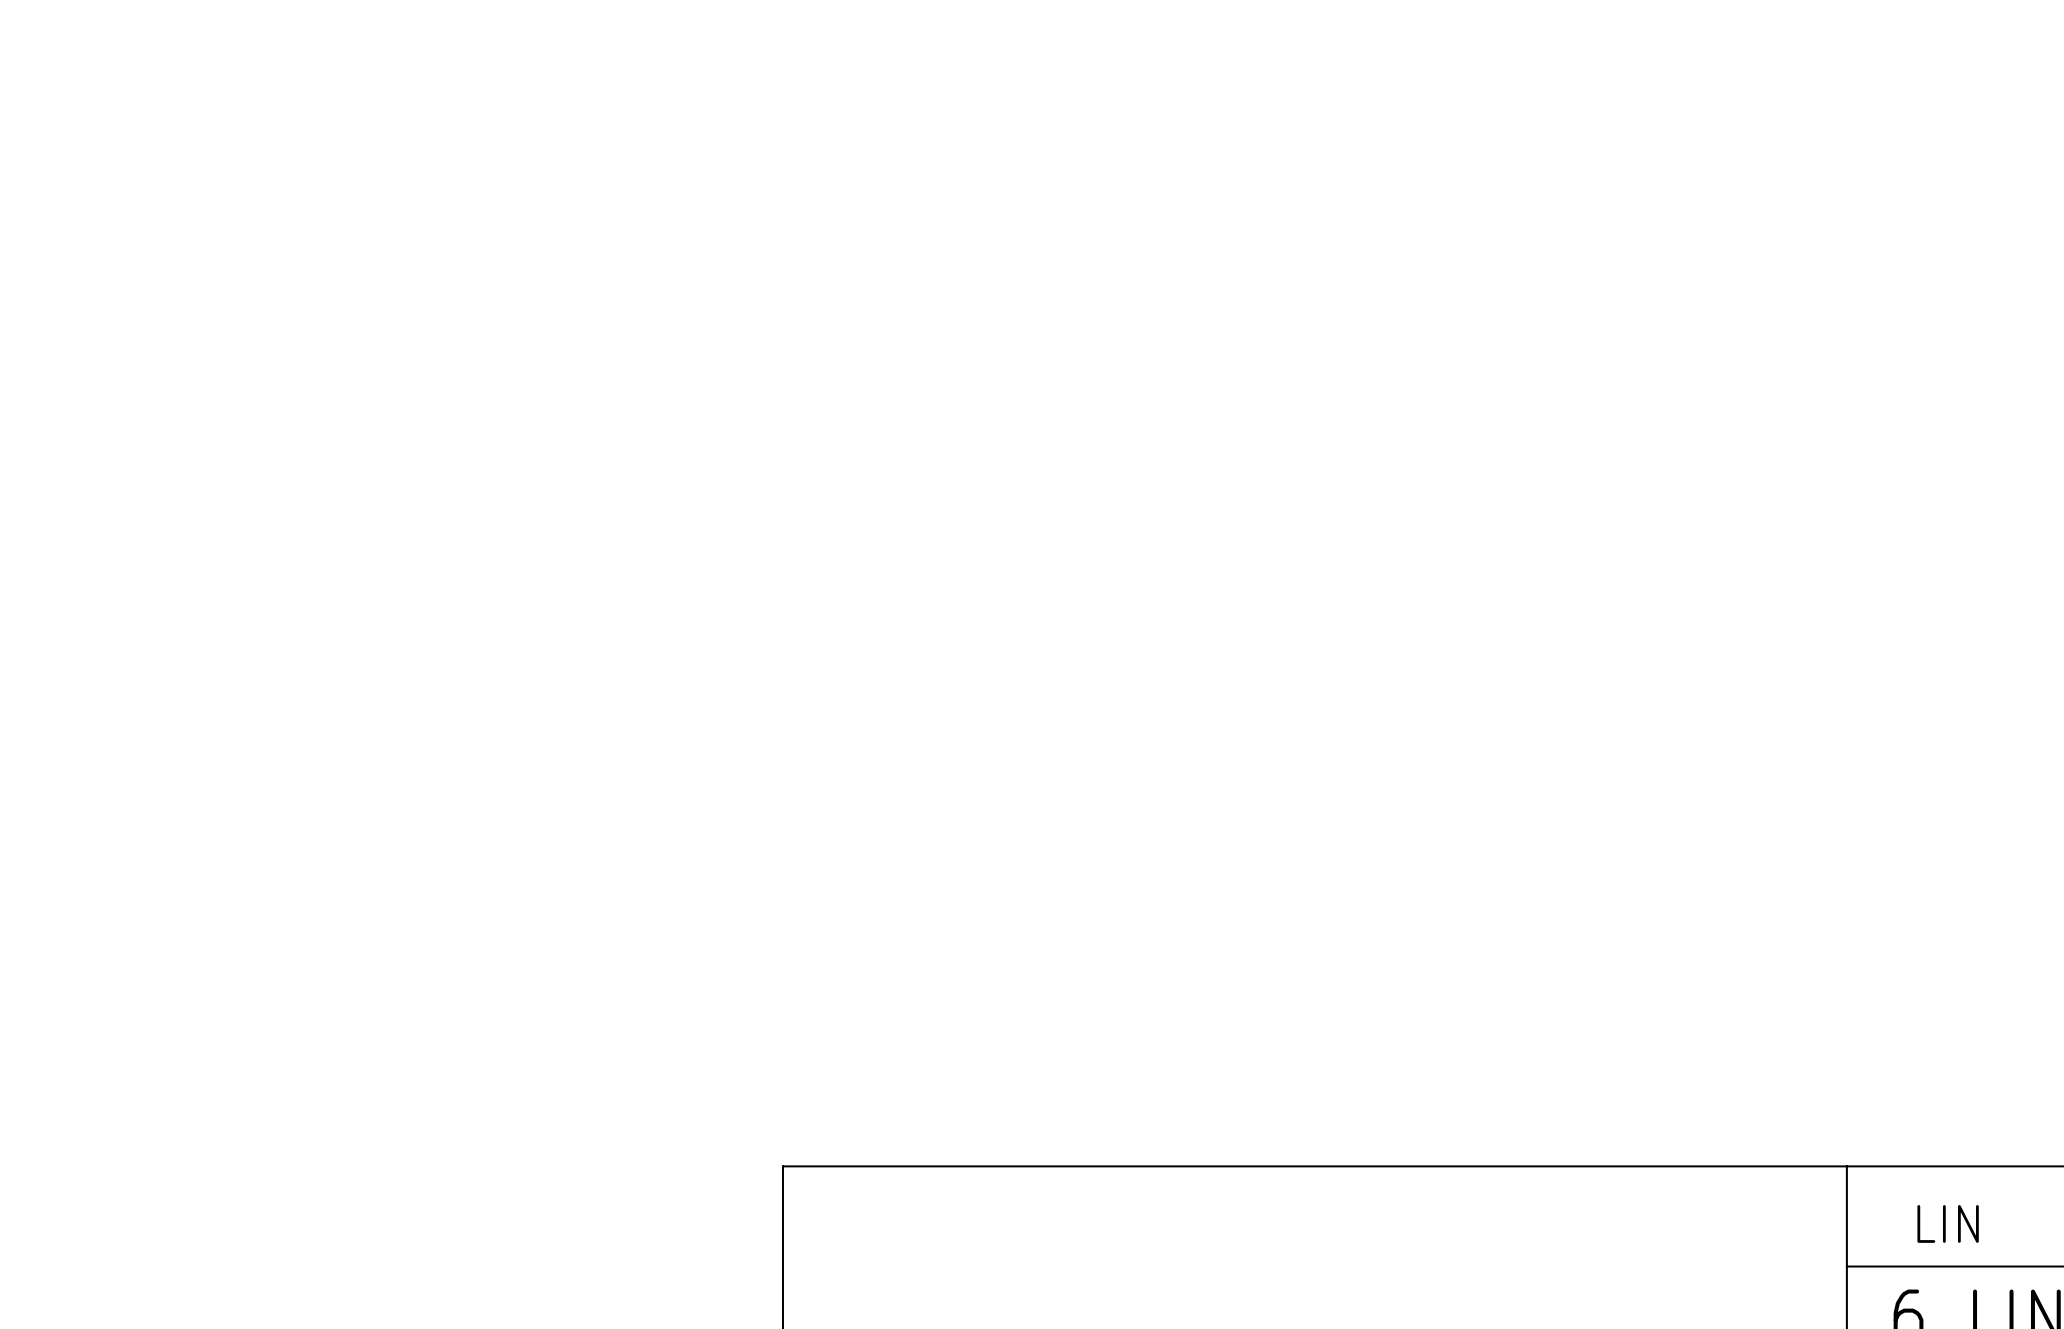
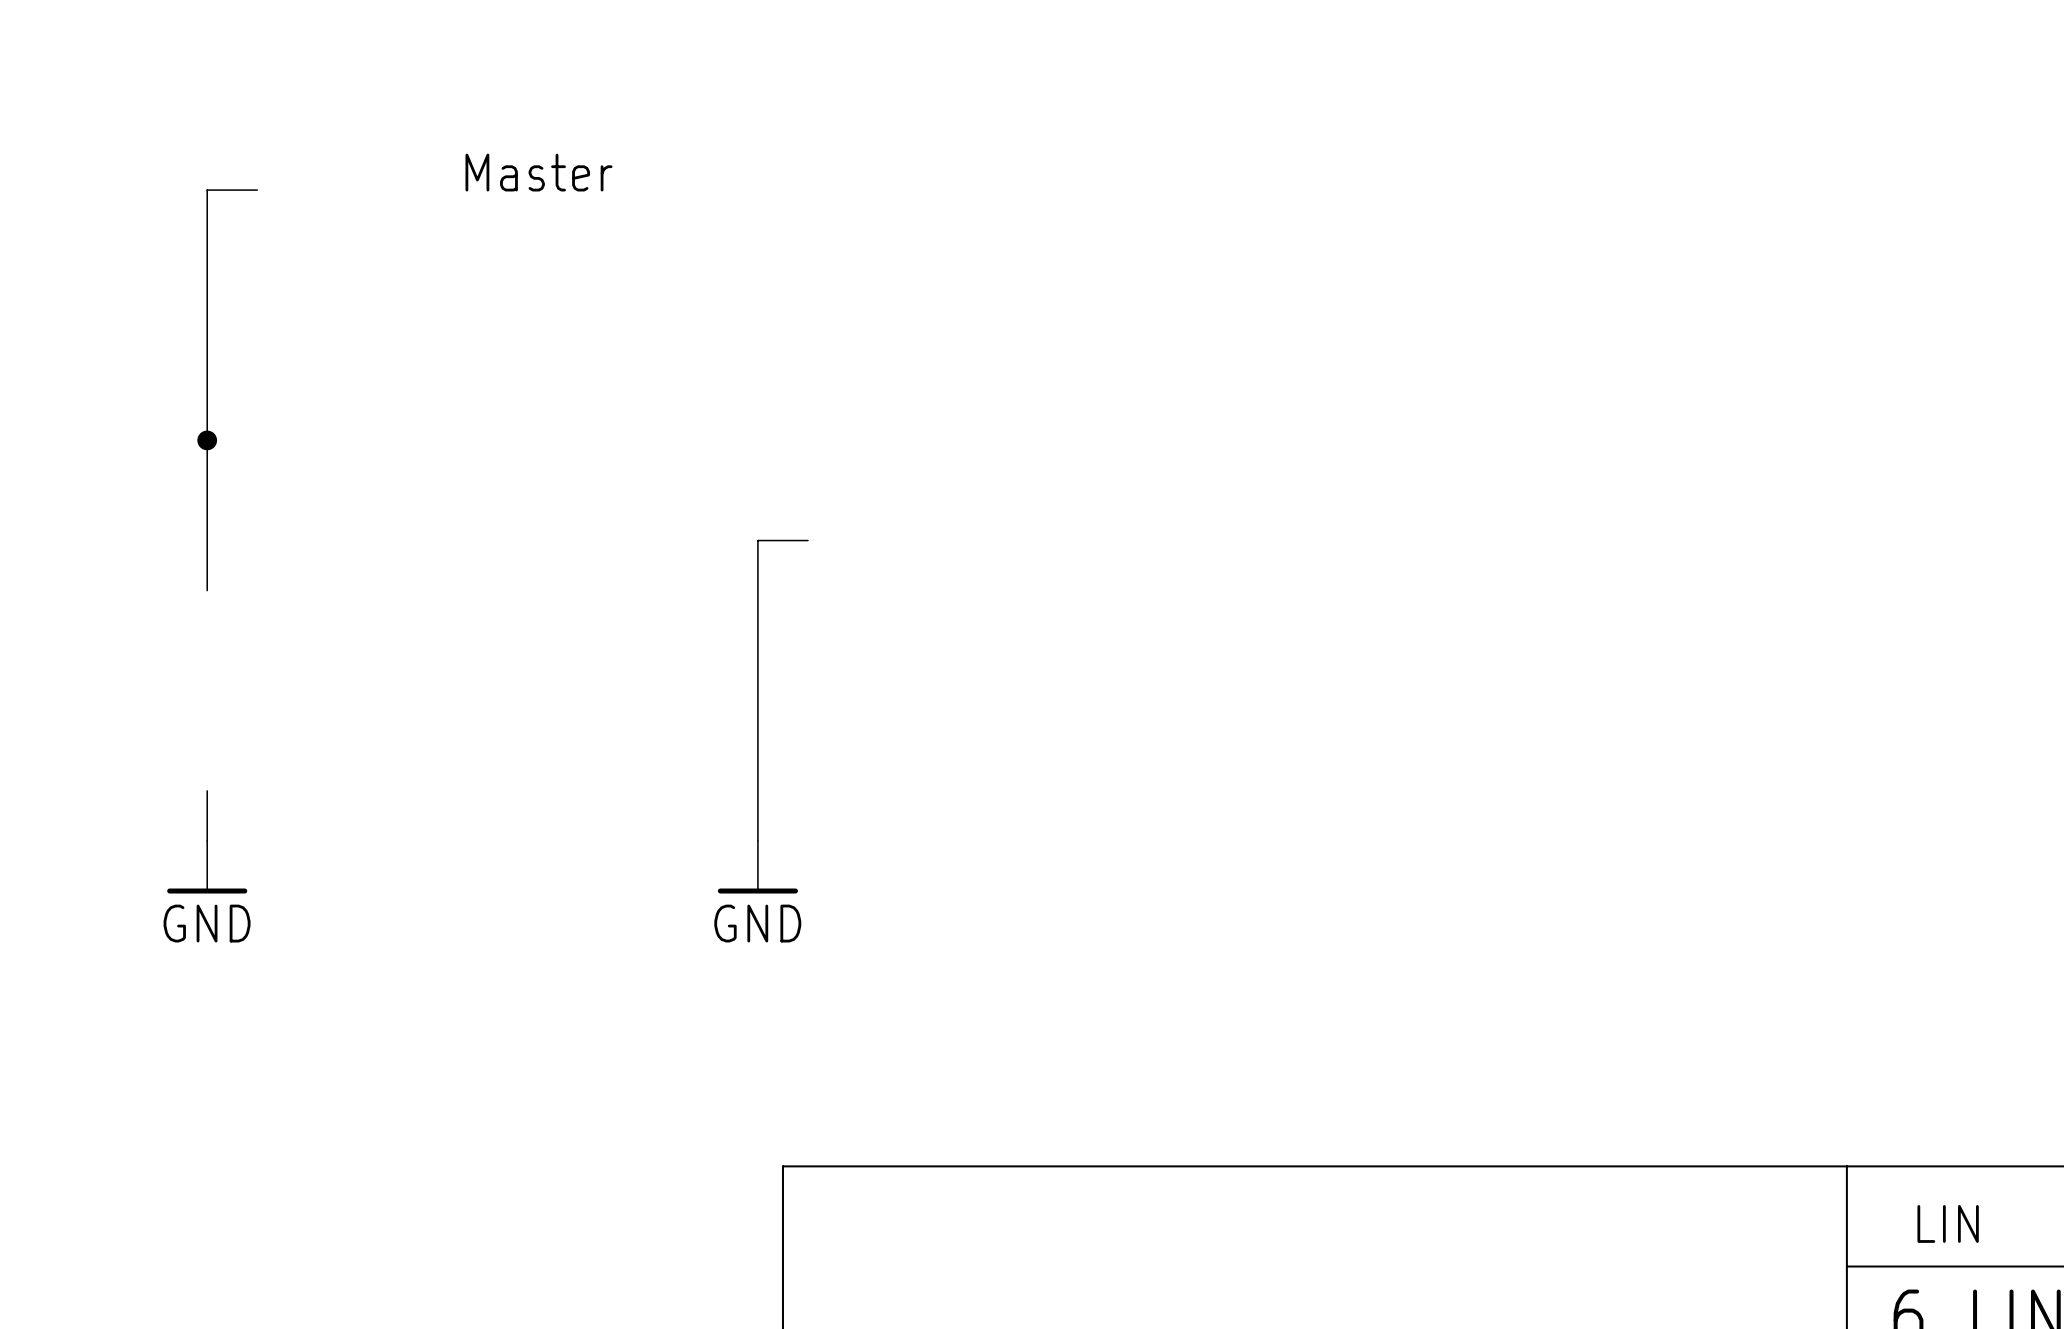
text: none -> Master (538, 172)
wire: none -> (257, 190) (207, 190) (207, 590)
junction: none -> (207, 440)
wire: none -> (808, 540) (757, 540) (757, 840)
wire: none -> (207, 790) (207, 840)
power symbol: none -> GND (207, 867)
power symbol: none -> GND (757, 867)

